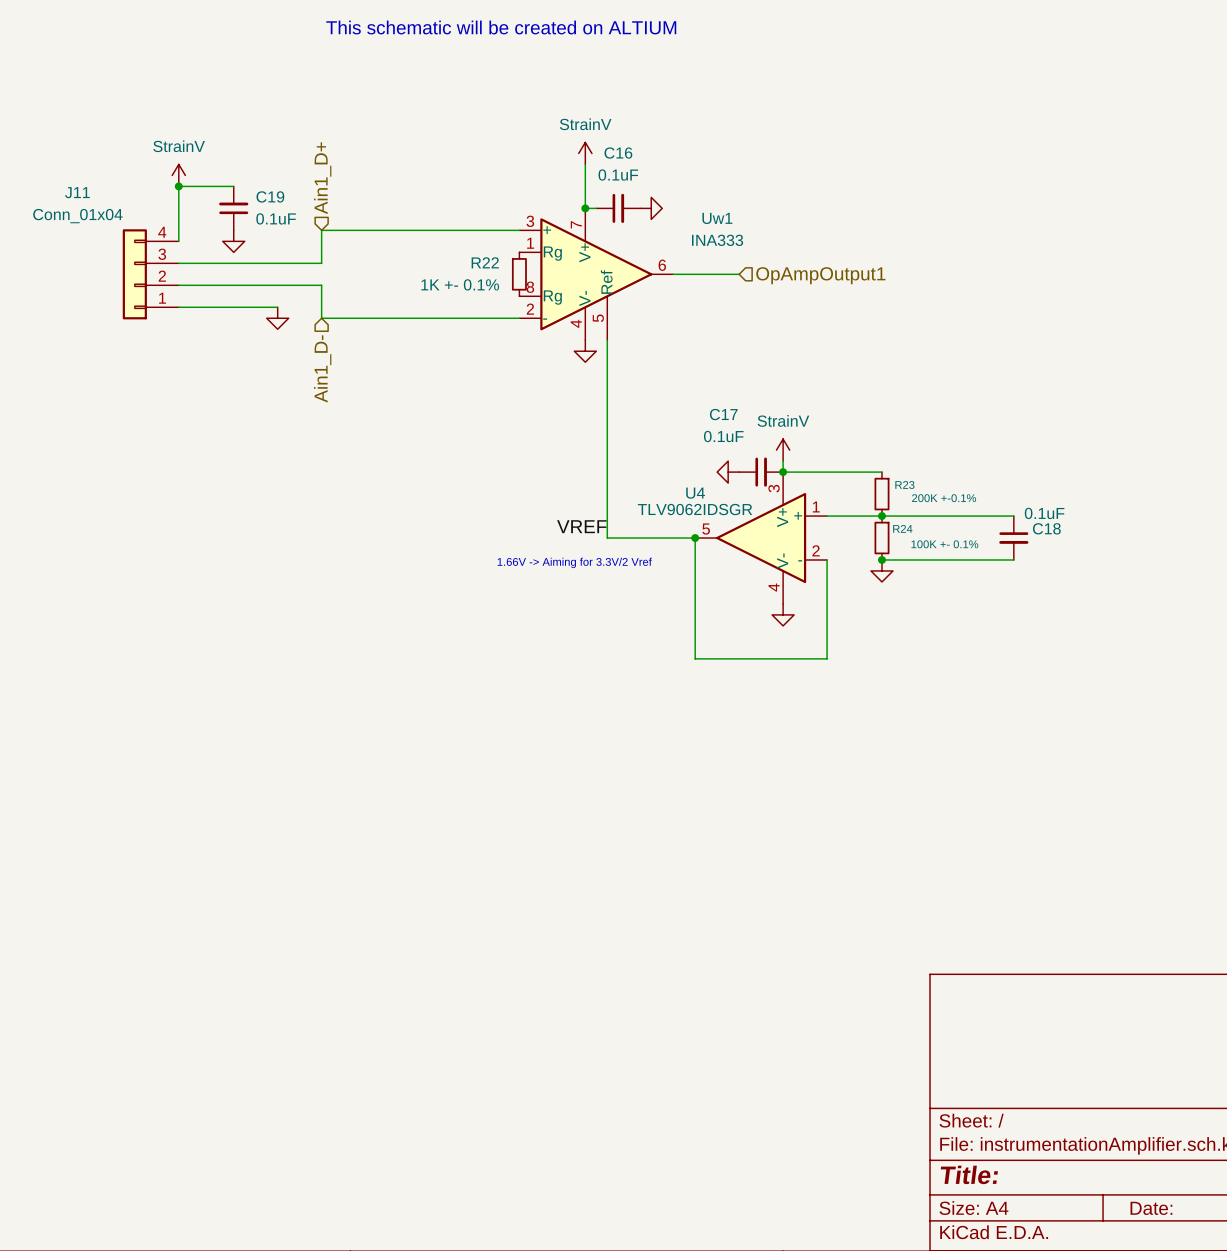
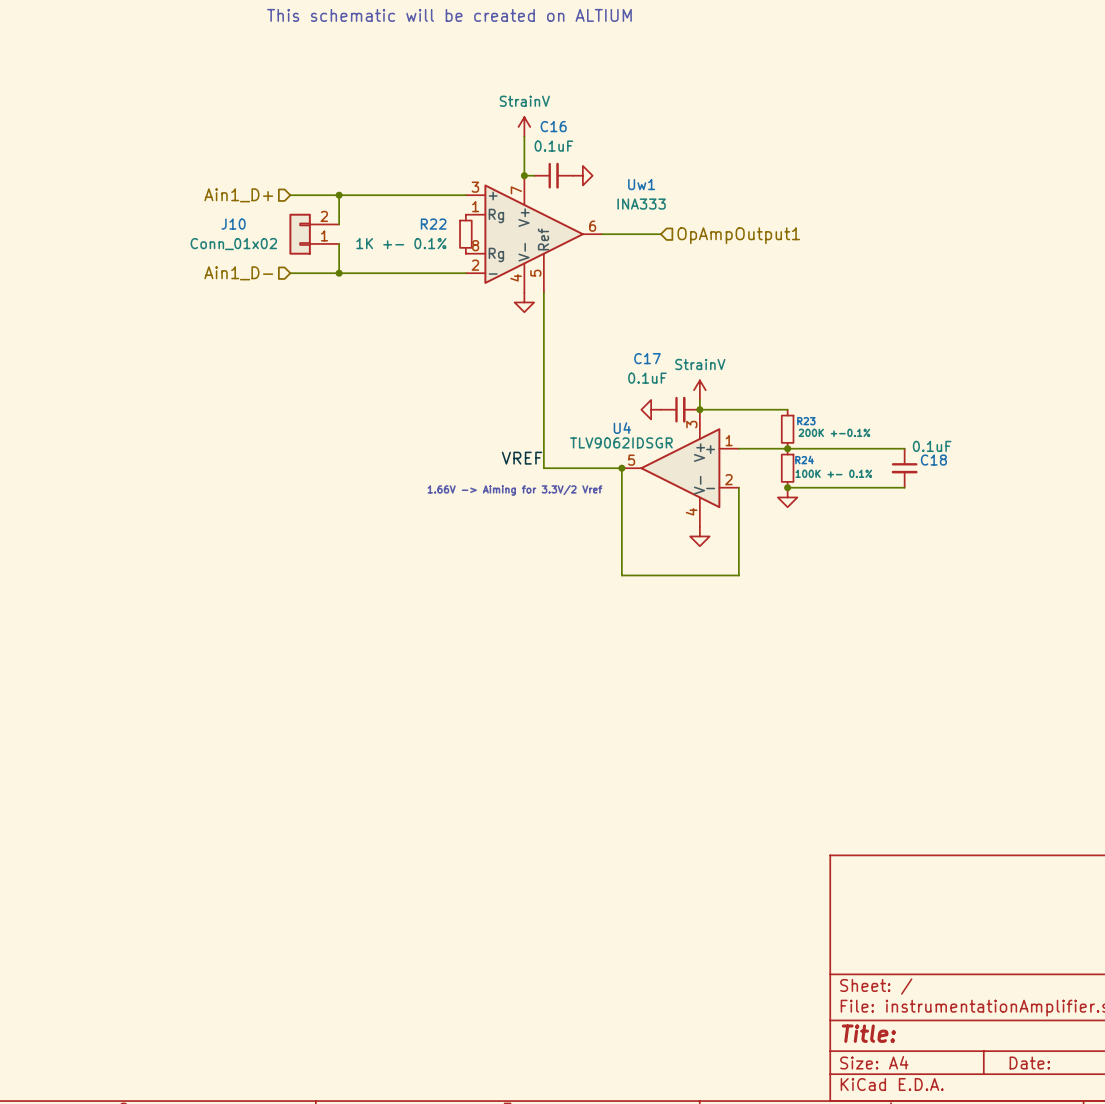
power symbol: StrainV (178, 175) -> none
hierarchical label rotation: 0° (322, 178) -> 90° counterclockwise (238, 195)
junction: (178, 186) -> none
wire: (233, 186) (178, 186) (178, 241) -> none
C19: 0.1uF (233, 208) -> none
wire: (321, 230) (321, 263) (178, 263) -> none
wire: none -> (339, 195) (339, 224)
junction: none -> (339, 195)
power symbol: (233, 241) -> none
J11: Conn_01x04 (150, 274) -> none
J10: none -> Conn_01x02 (314, 234)
wire: (178, 285) (321, 285) (321, 318) -> none
wire: none -> (339, 243) (339, 273)
wire: (178, 307) (277, 307) -> none
power symbol: (277, 318) -> none
junction: none -> (339, 273)
hierarchical label rotation: 0° (322, 368) -> 90° clockwise (238, 273)

